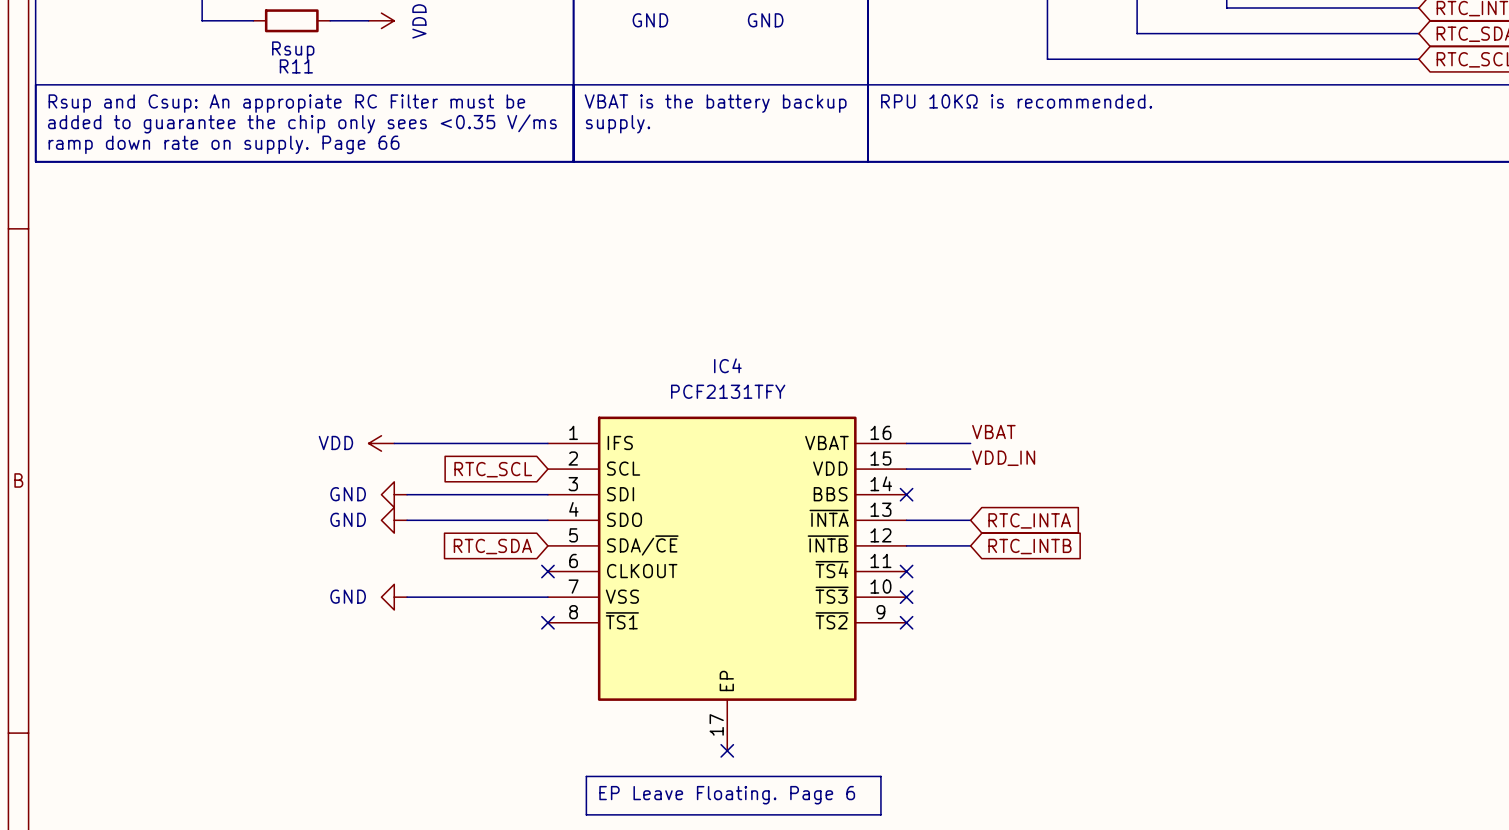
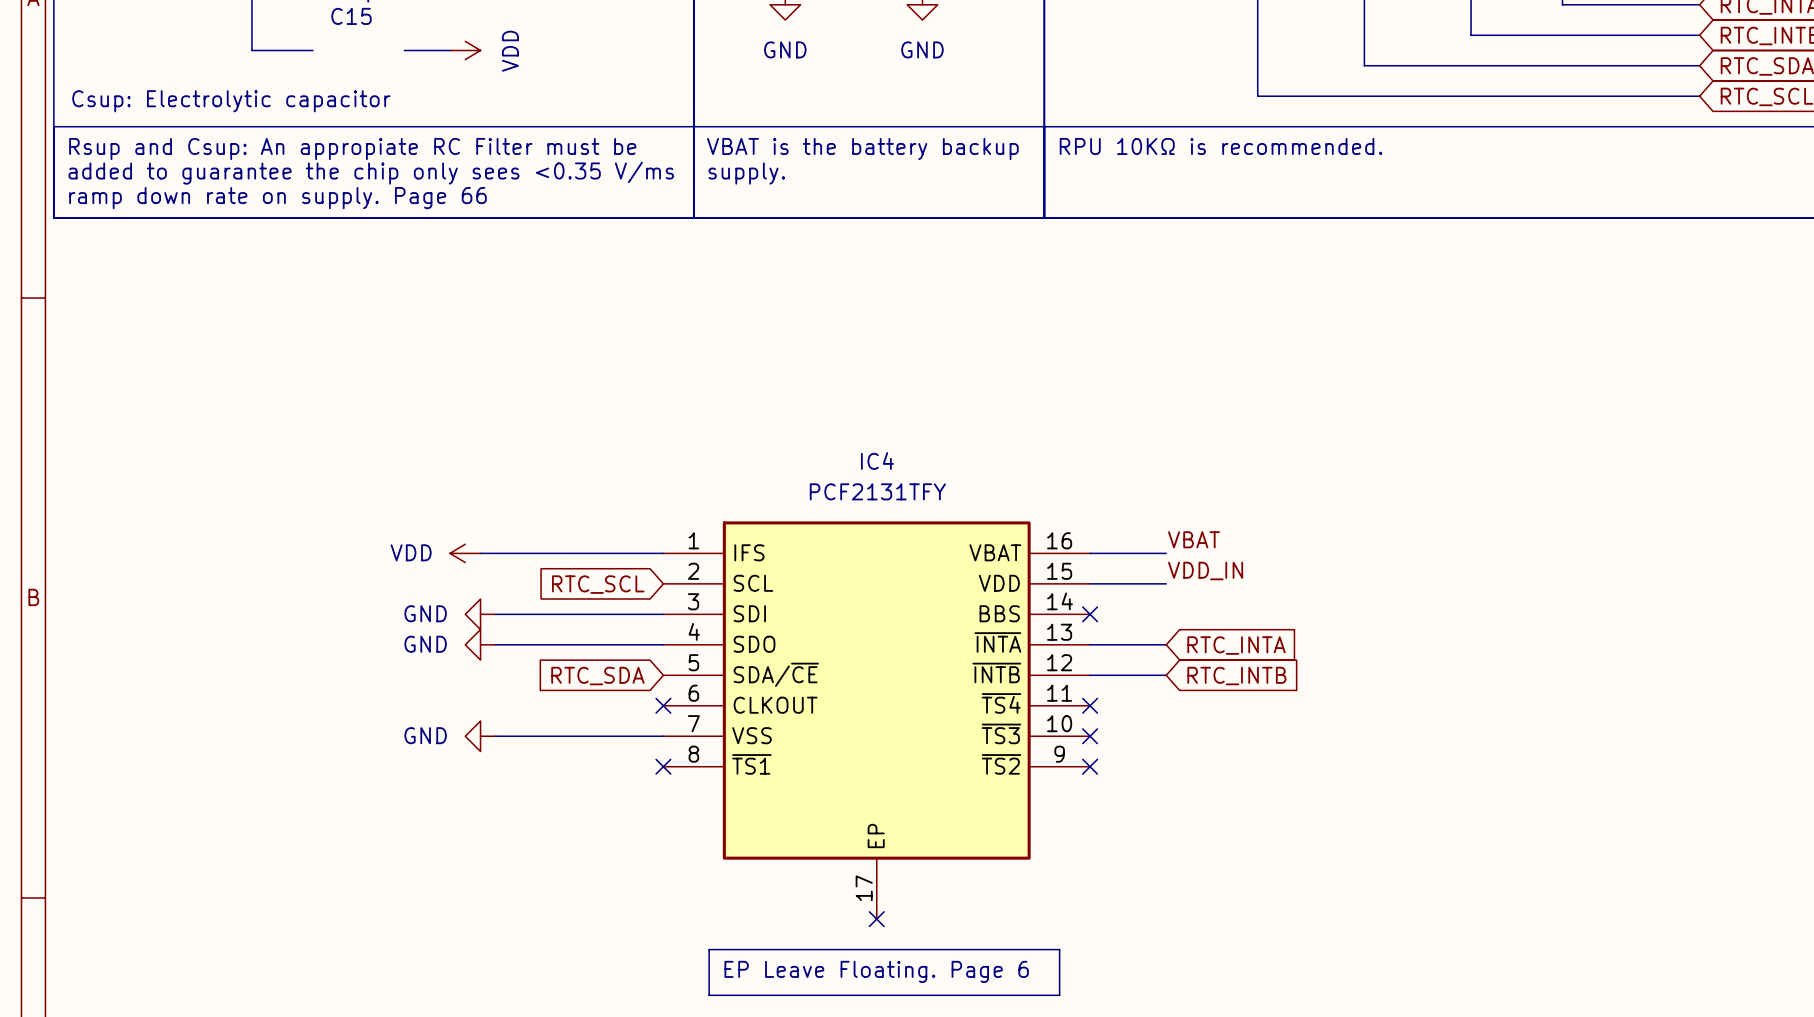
R11: Rsup (291, 20) -> none
text: none -> Csup: Electrolytic capacitor (231, 101)

